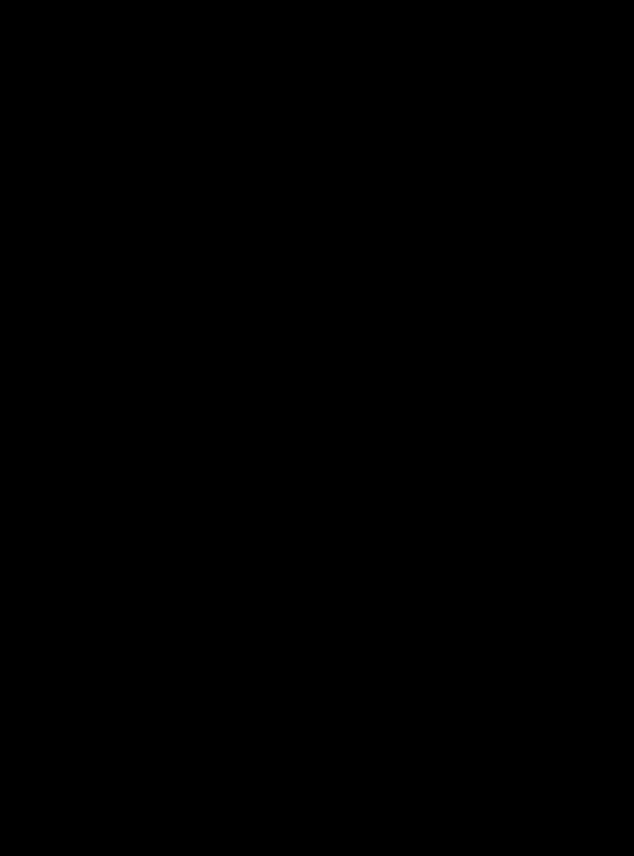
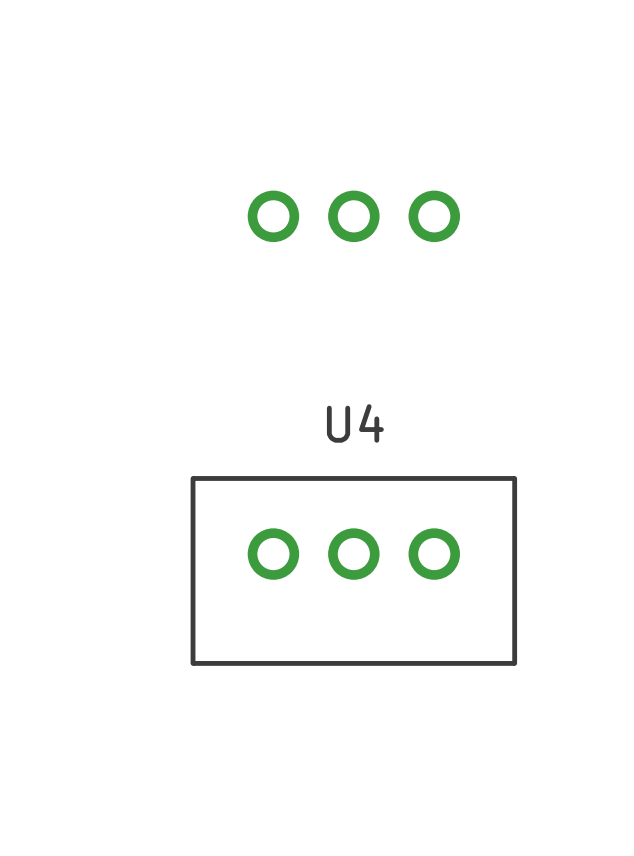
part: none -> (353, 216)
U4: none -> (353, 570)

